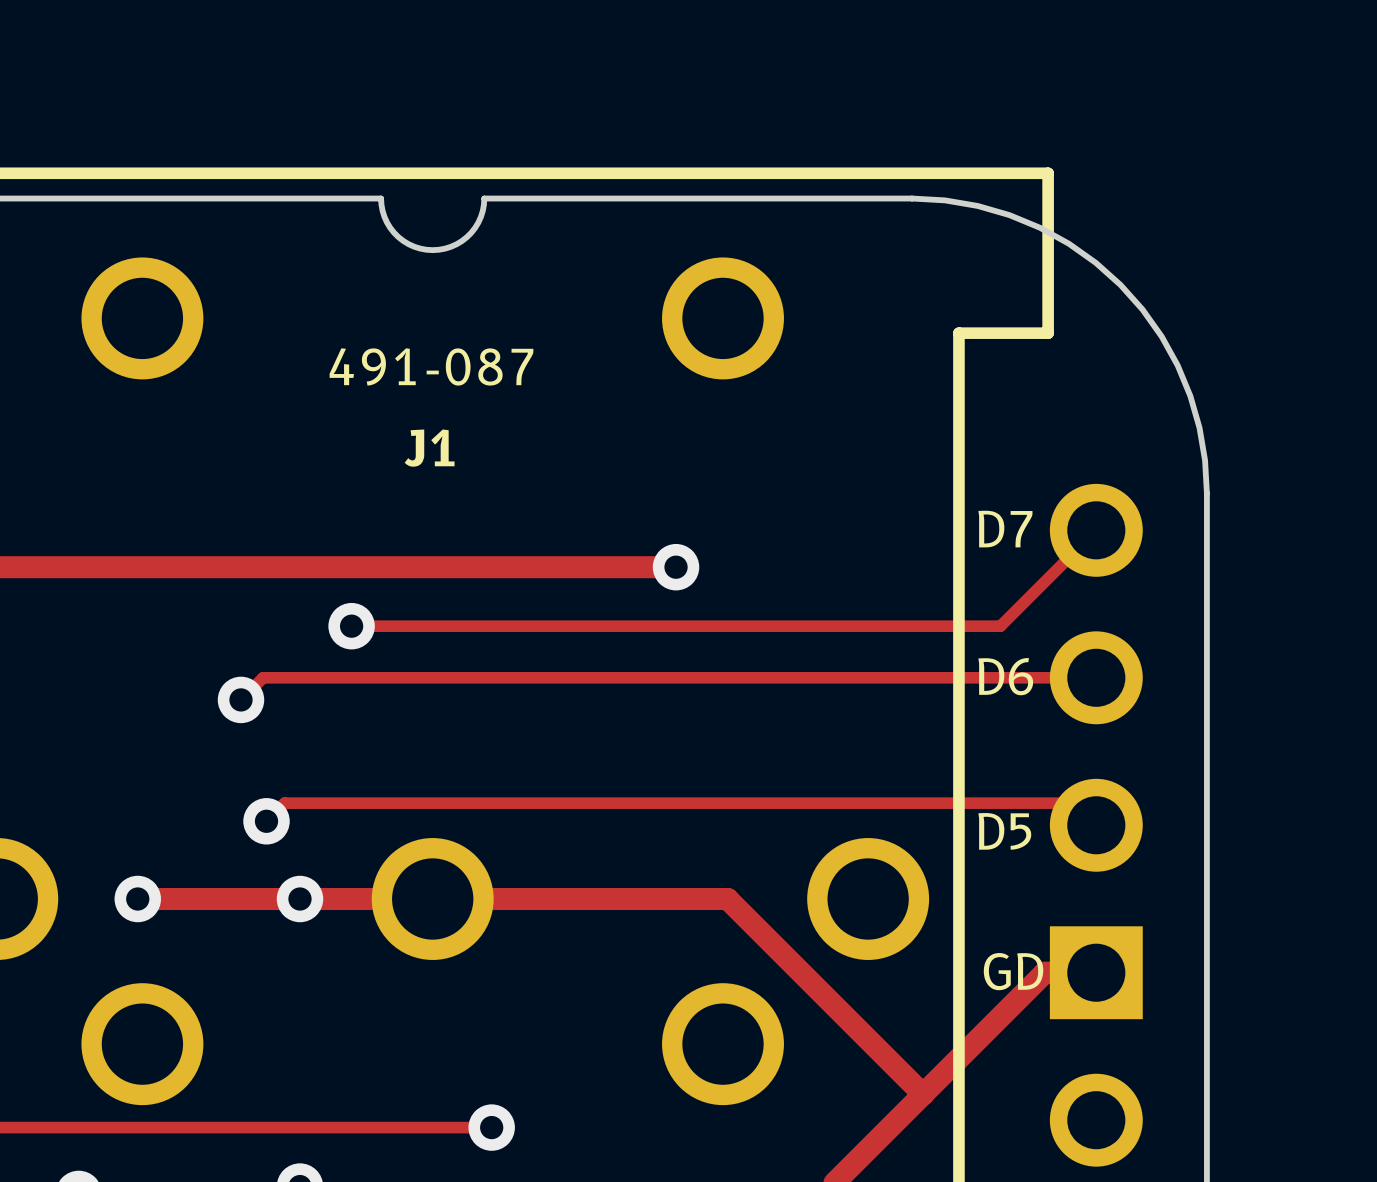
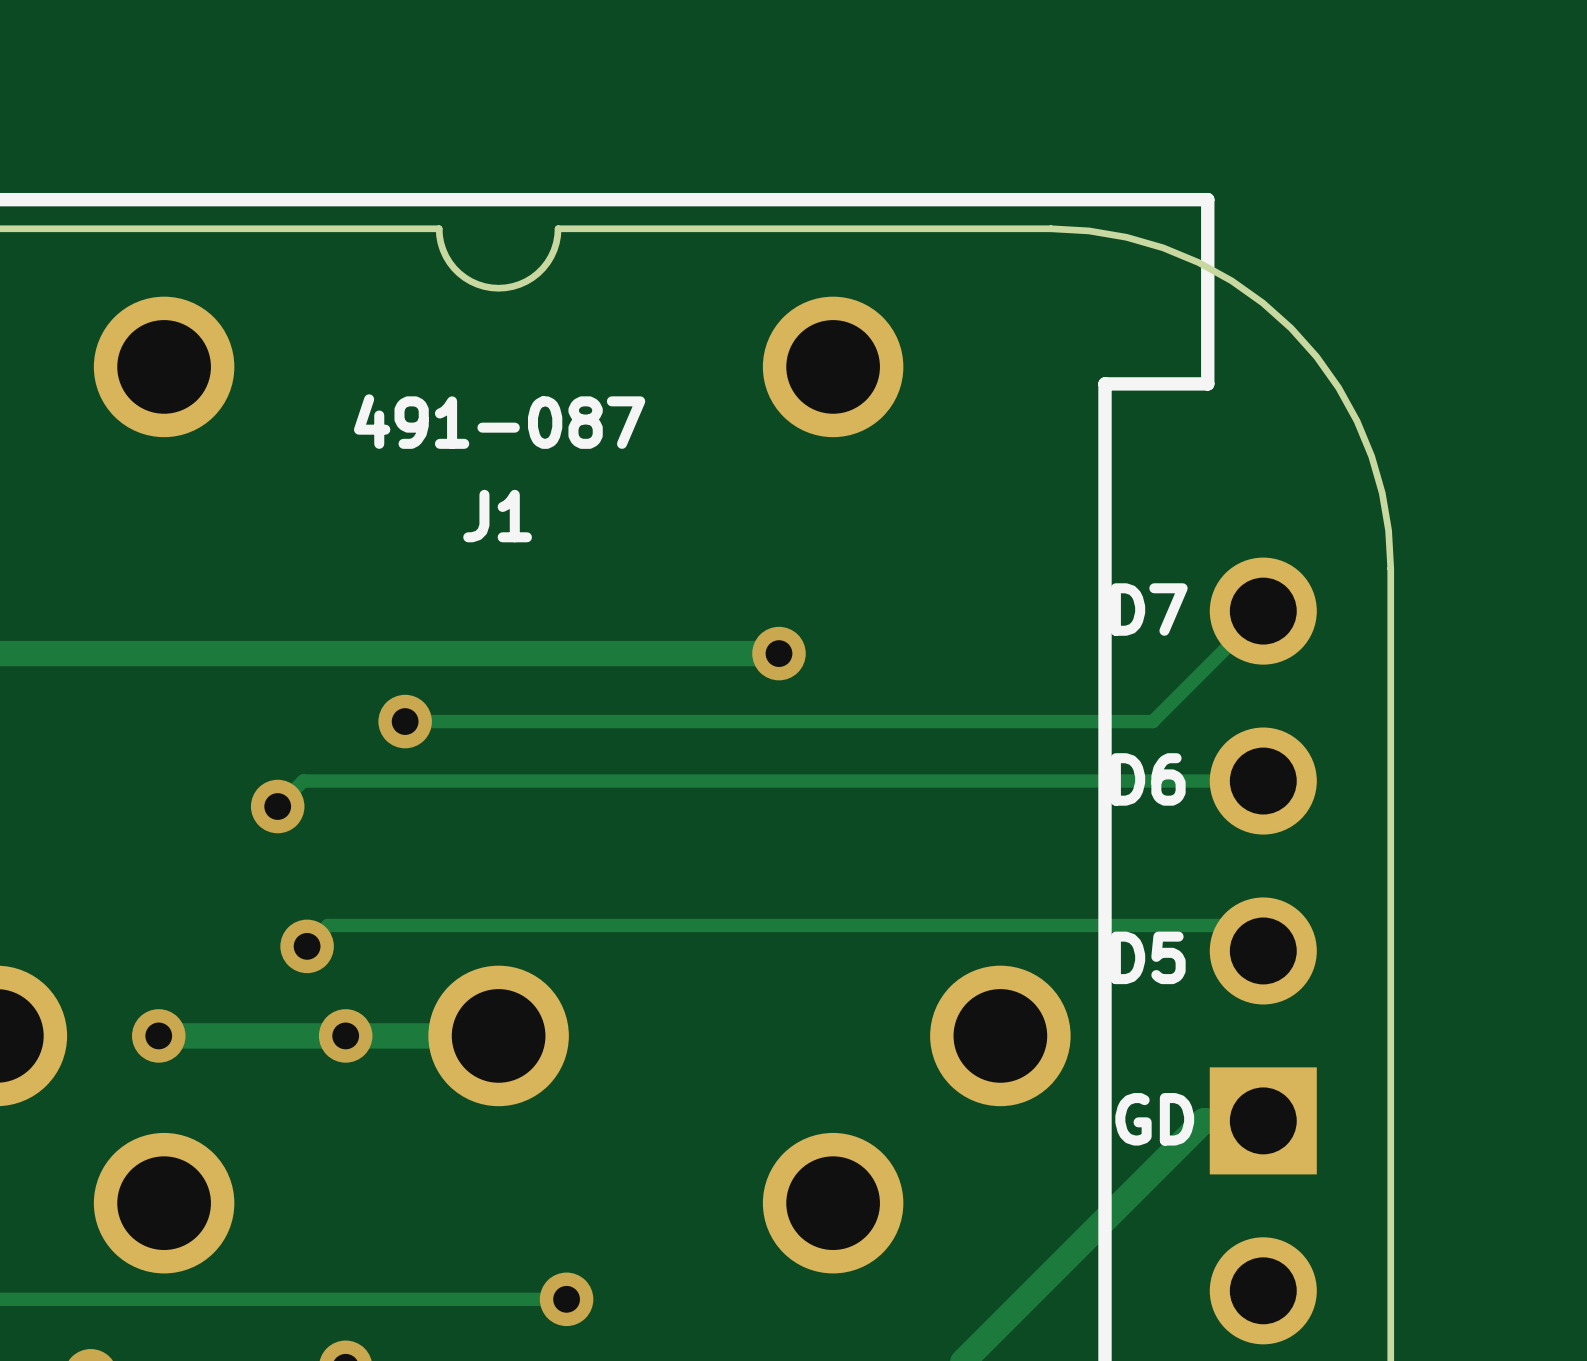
track: (432, 899) (727, 899) (923, 1094) -> none

